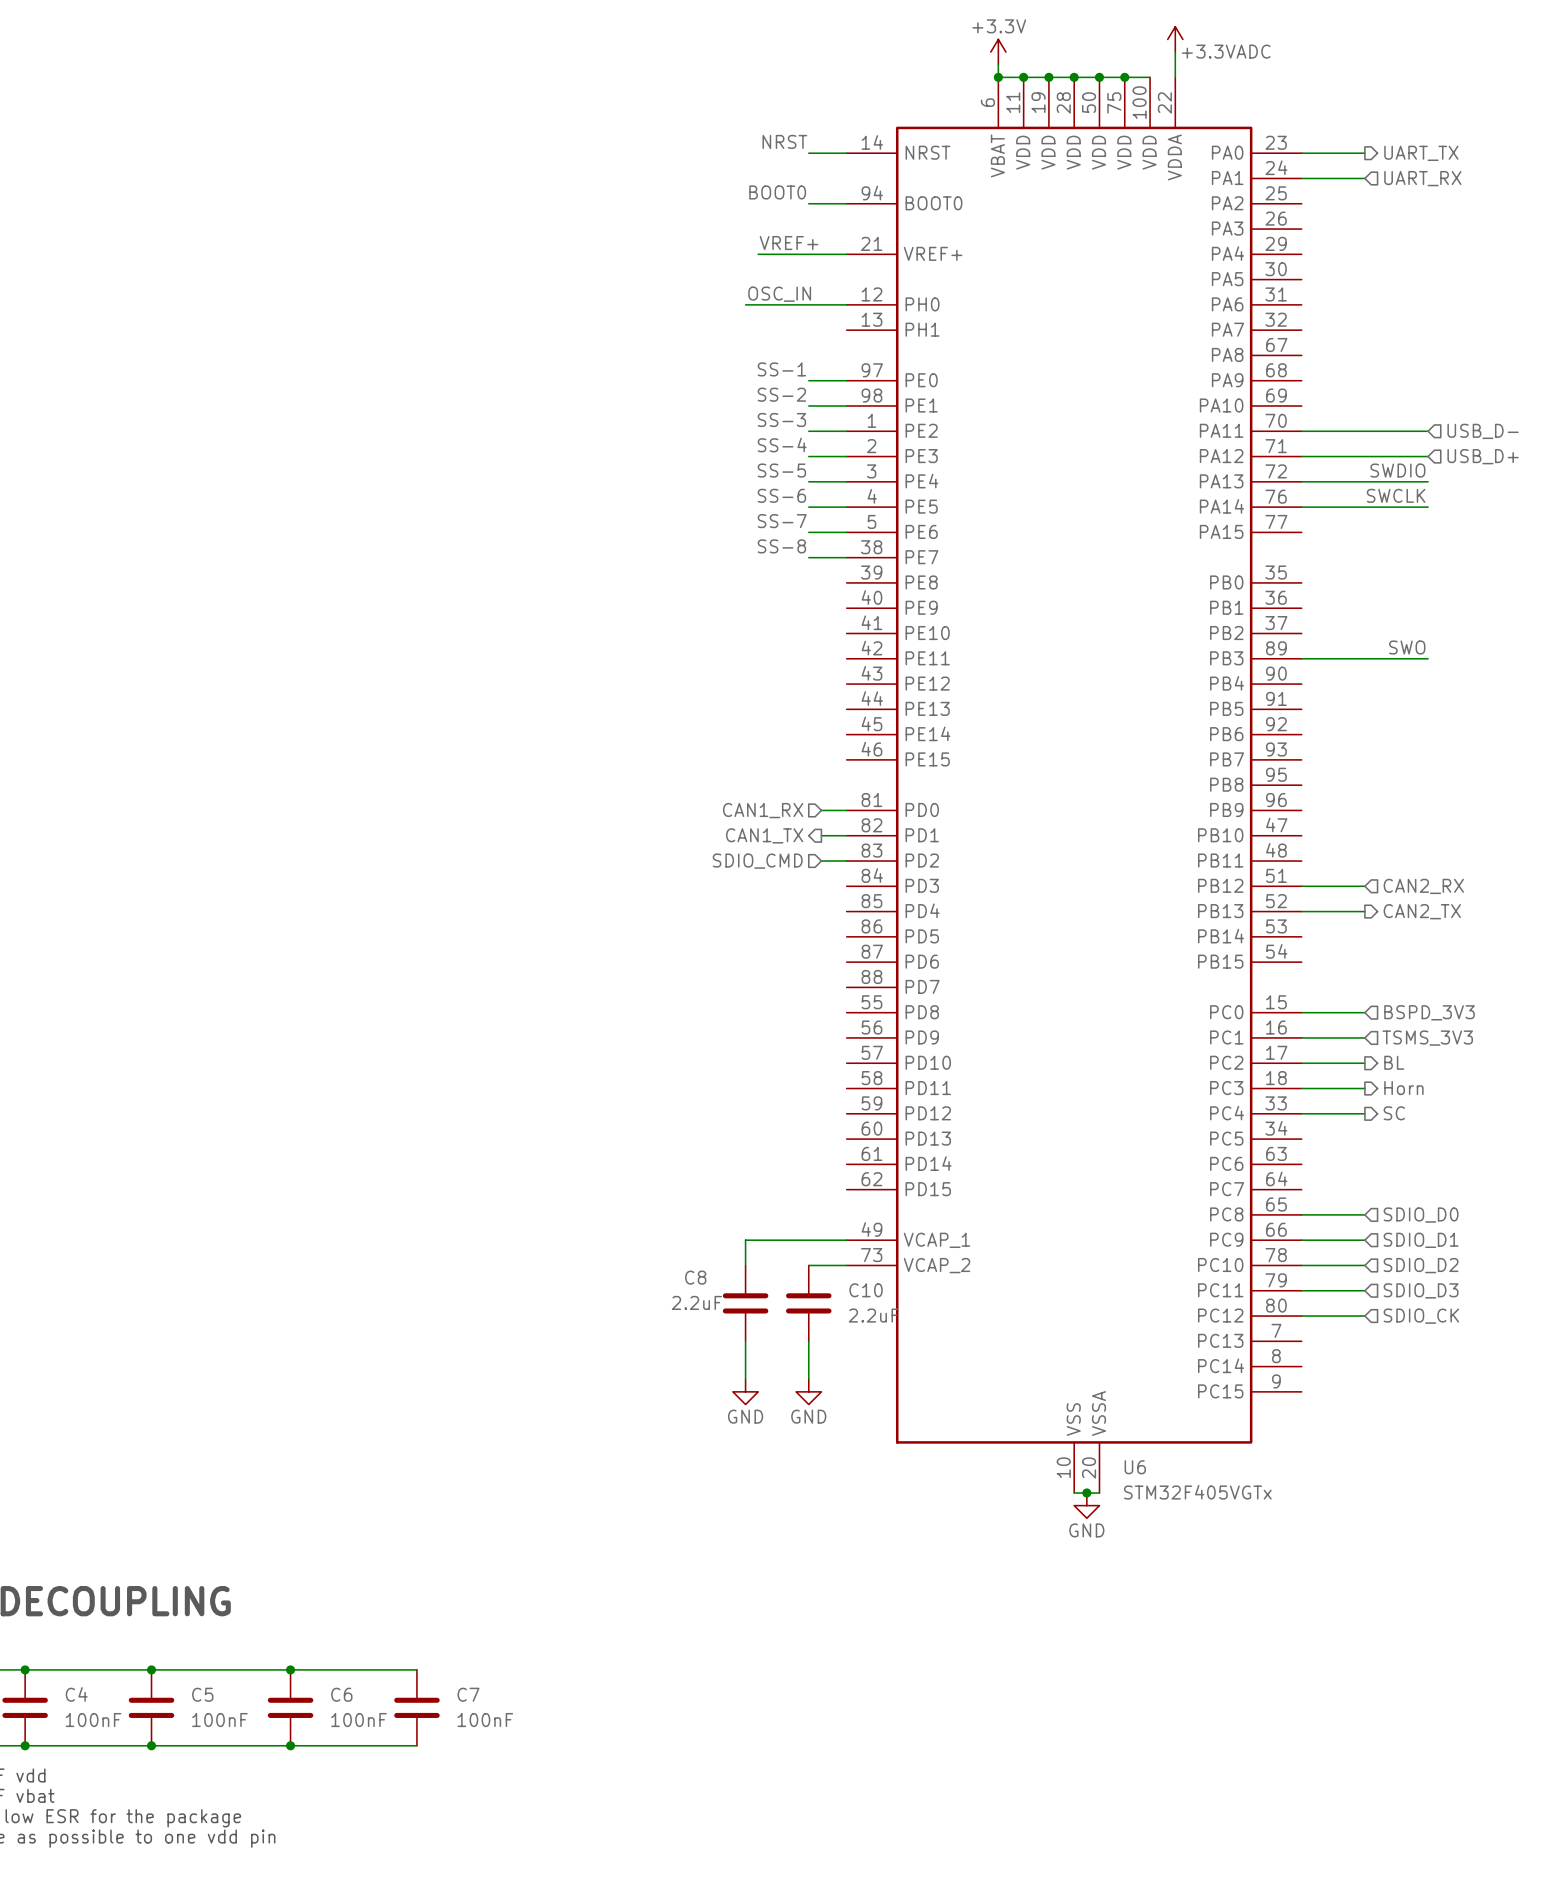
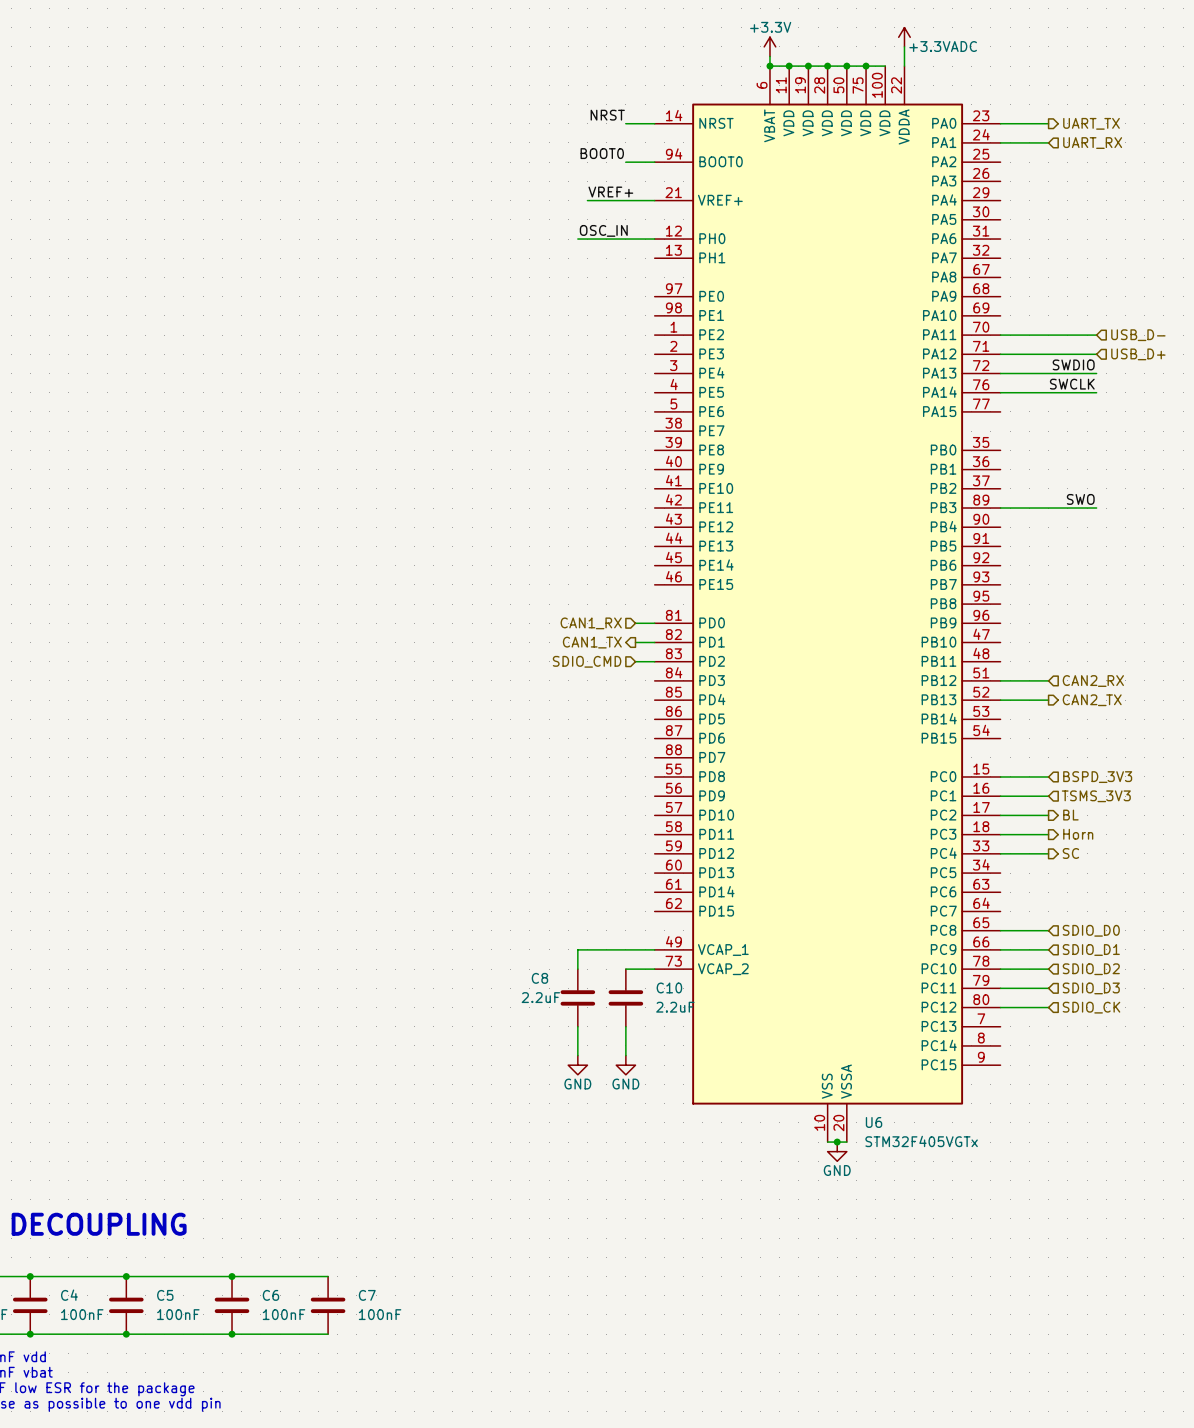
label: SS-1 (781, 369) -> none
wire: (808, 380) (846, 380) -> none
label: SS-2 (781, 394) -> none
wire: (808, 405) (846, 405) -> none
label: SS-3 (781, 419) -> none
wire: (808, 431) (846, 431) -> none
label: SS-4 (782, 444) -> none
wire: (808, 456) (846, 456) -> none
label: SS-5 (781, 470) -> none
wire: (808, 481) (846, 481) -> none
label: SS-6 (781, 495) -> none
wire: (808, 507) (846, 507) -> none
label: SS-7 (782, 521) -> none
wire: (808, 532) (846, 532) -> none
label: SS-8 (781, 546) -> none
wire: (808, 557) (846, 557) -> none

